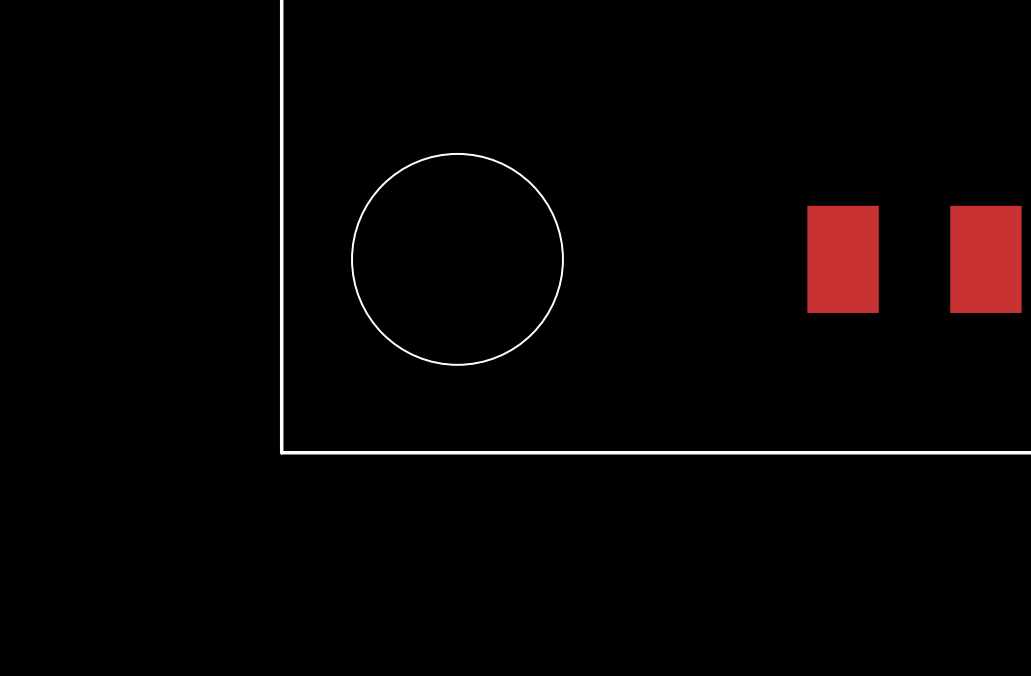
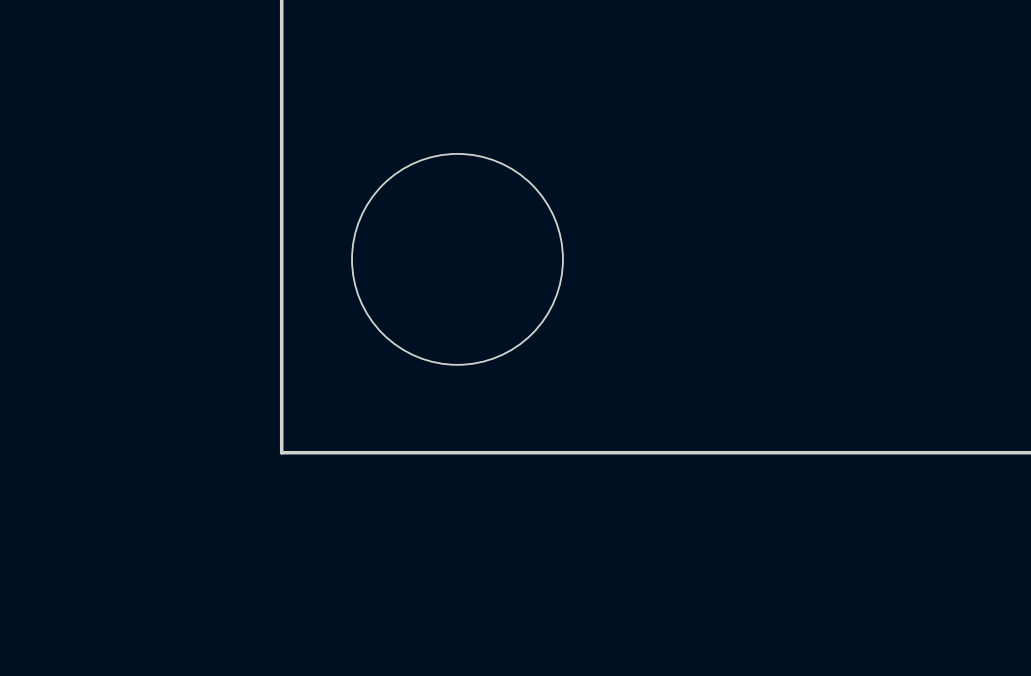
part: (914, 259) -> none

